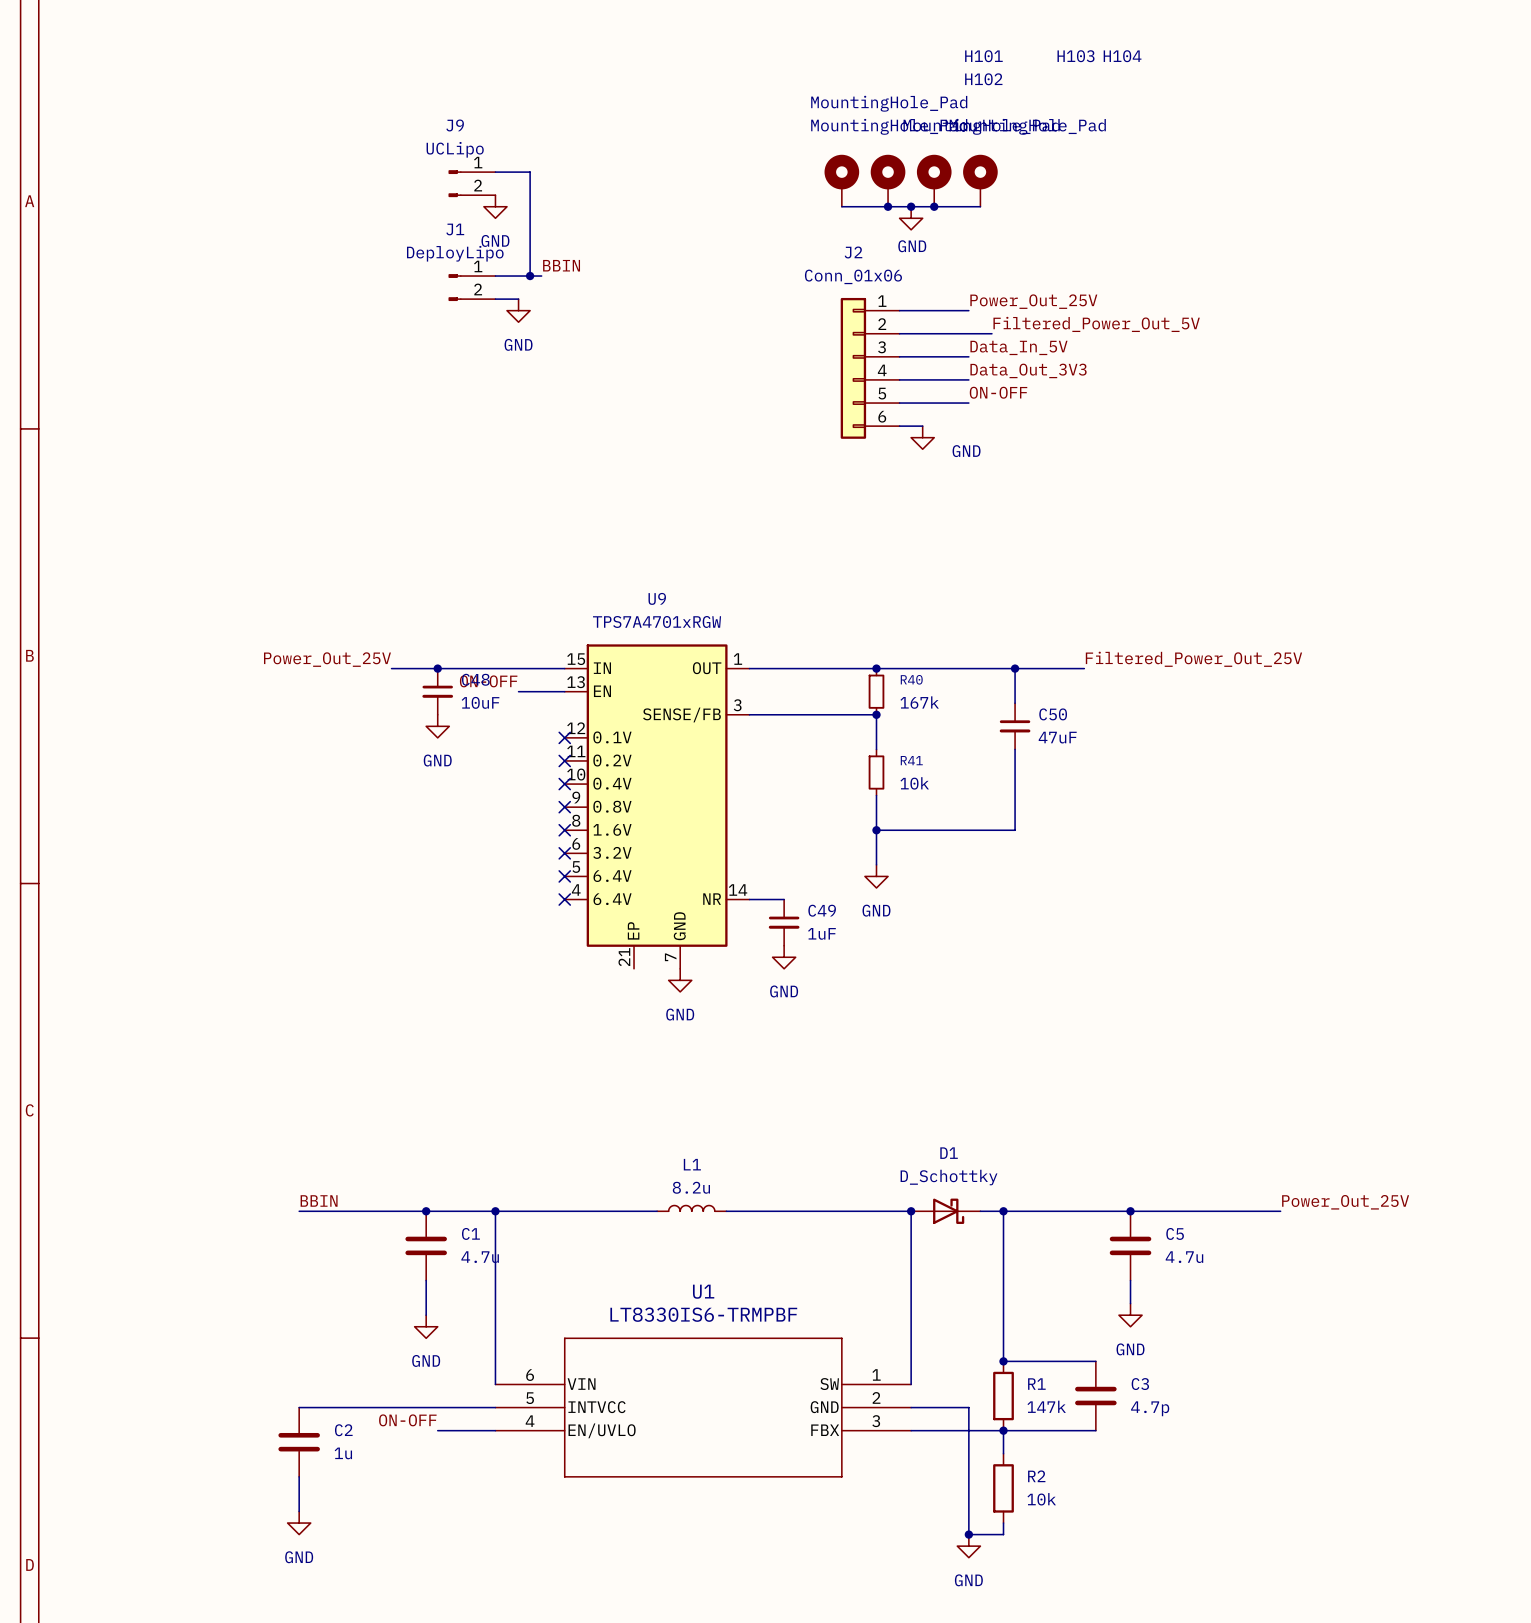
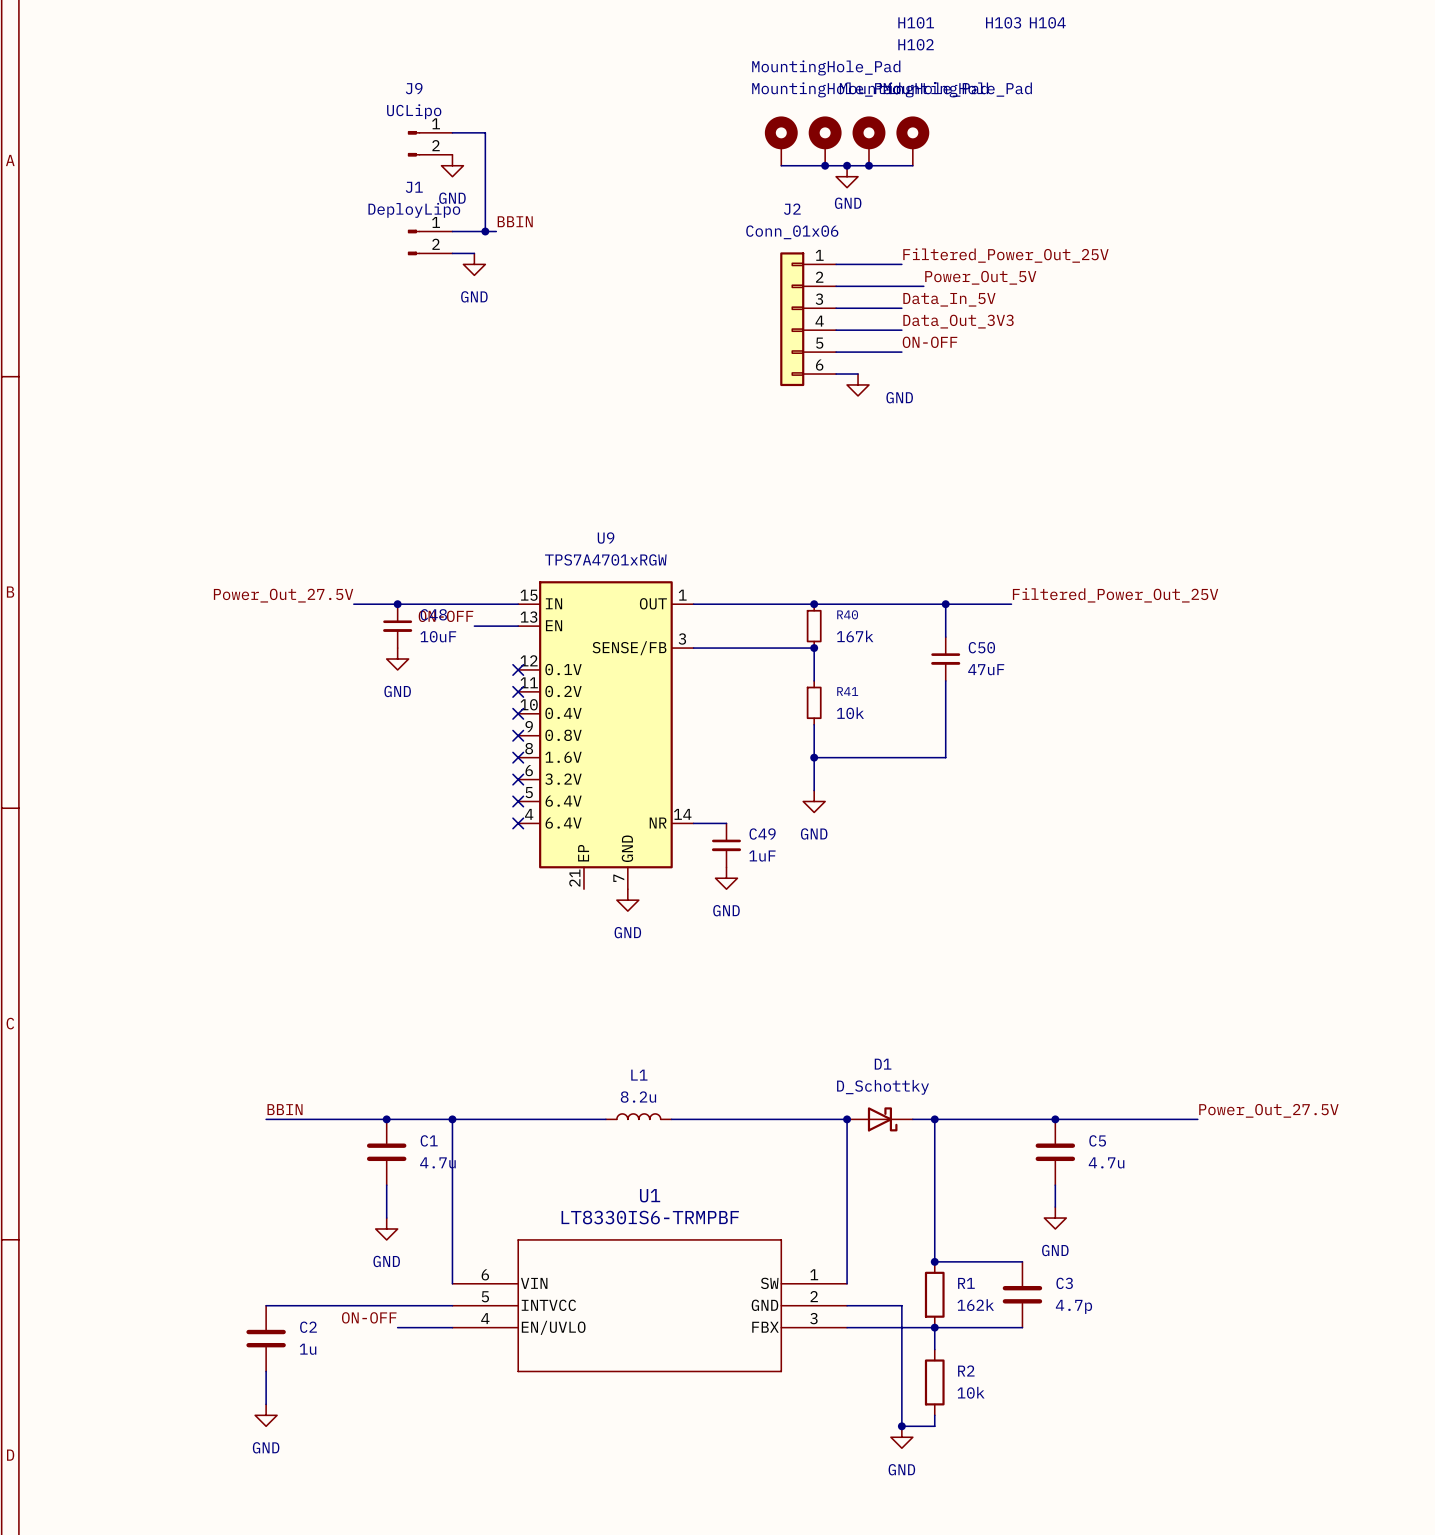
label: Power_Out_25V (1033, 301) -> Filtered_Power_Out_25V (1005, 255)
label: Filtered_Power_Out_5V (1096, 324) -> Power_Out_5V (980, 277)
label: Power_Out_25V (327, 659) -> Power_Out_27.5V (283, 595)
label: Power_Out_25V (1345, 1202) -> Power_Out_27.5V (1268, 1110)
R1 value: 147k (1046, 1406) -> 162k (975, 1305)

